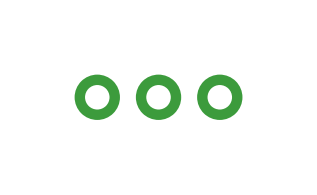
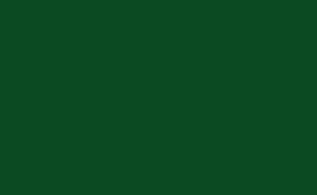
part: (158, 97) -> none

